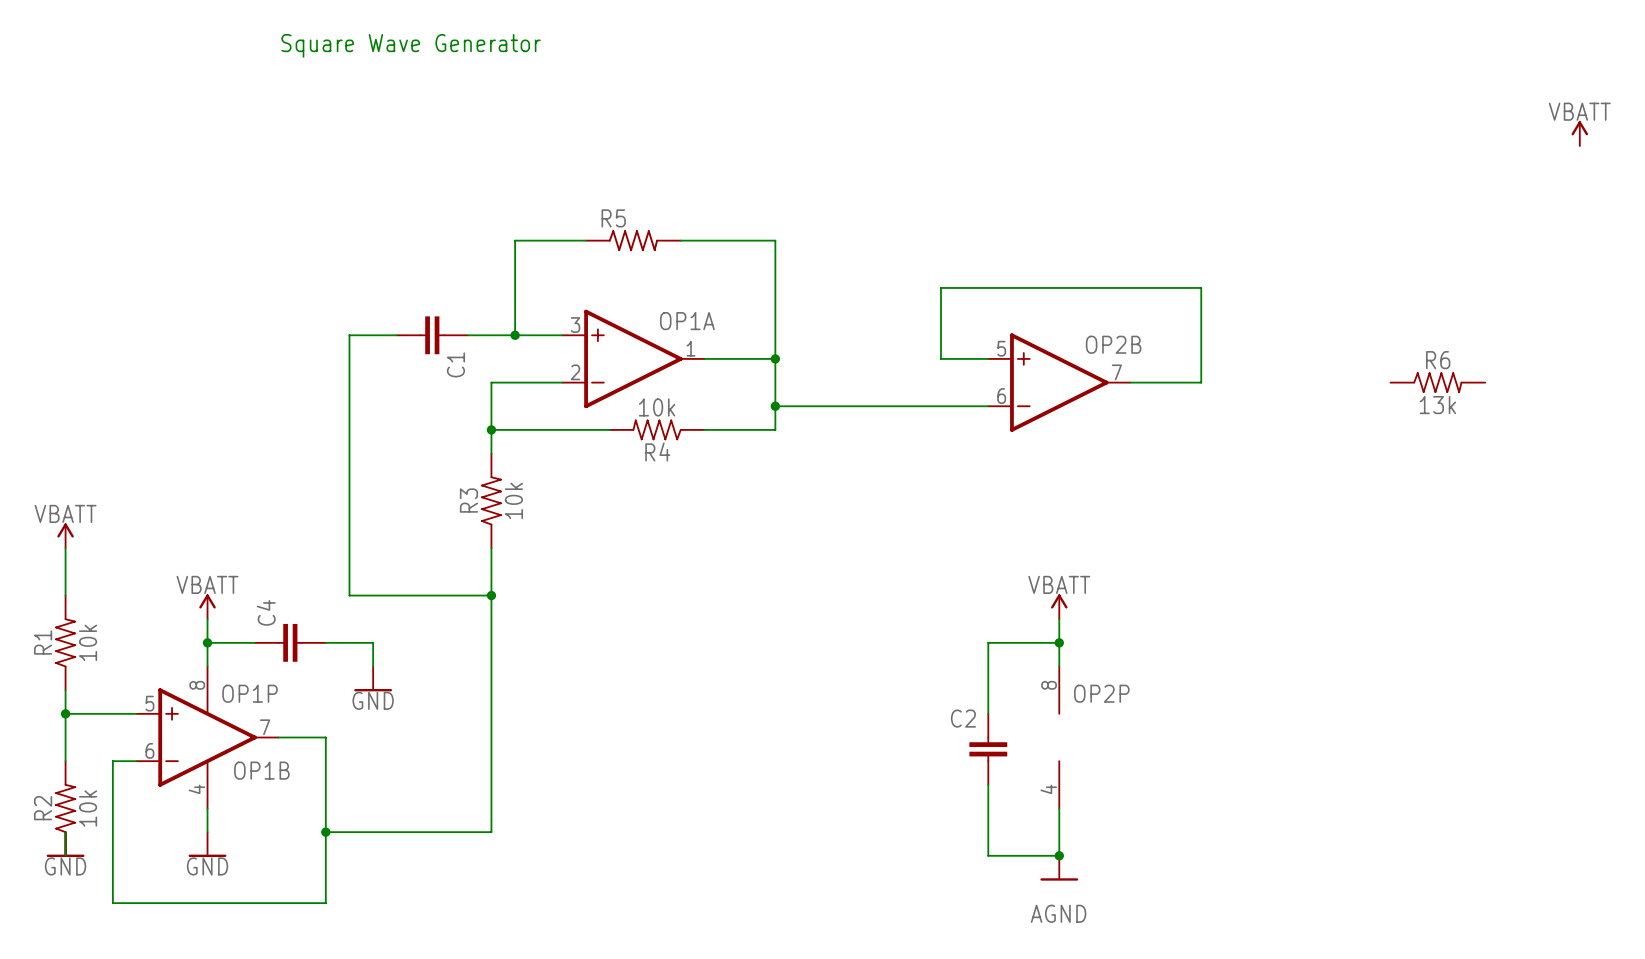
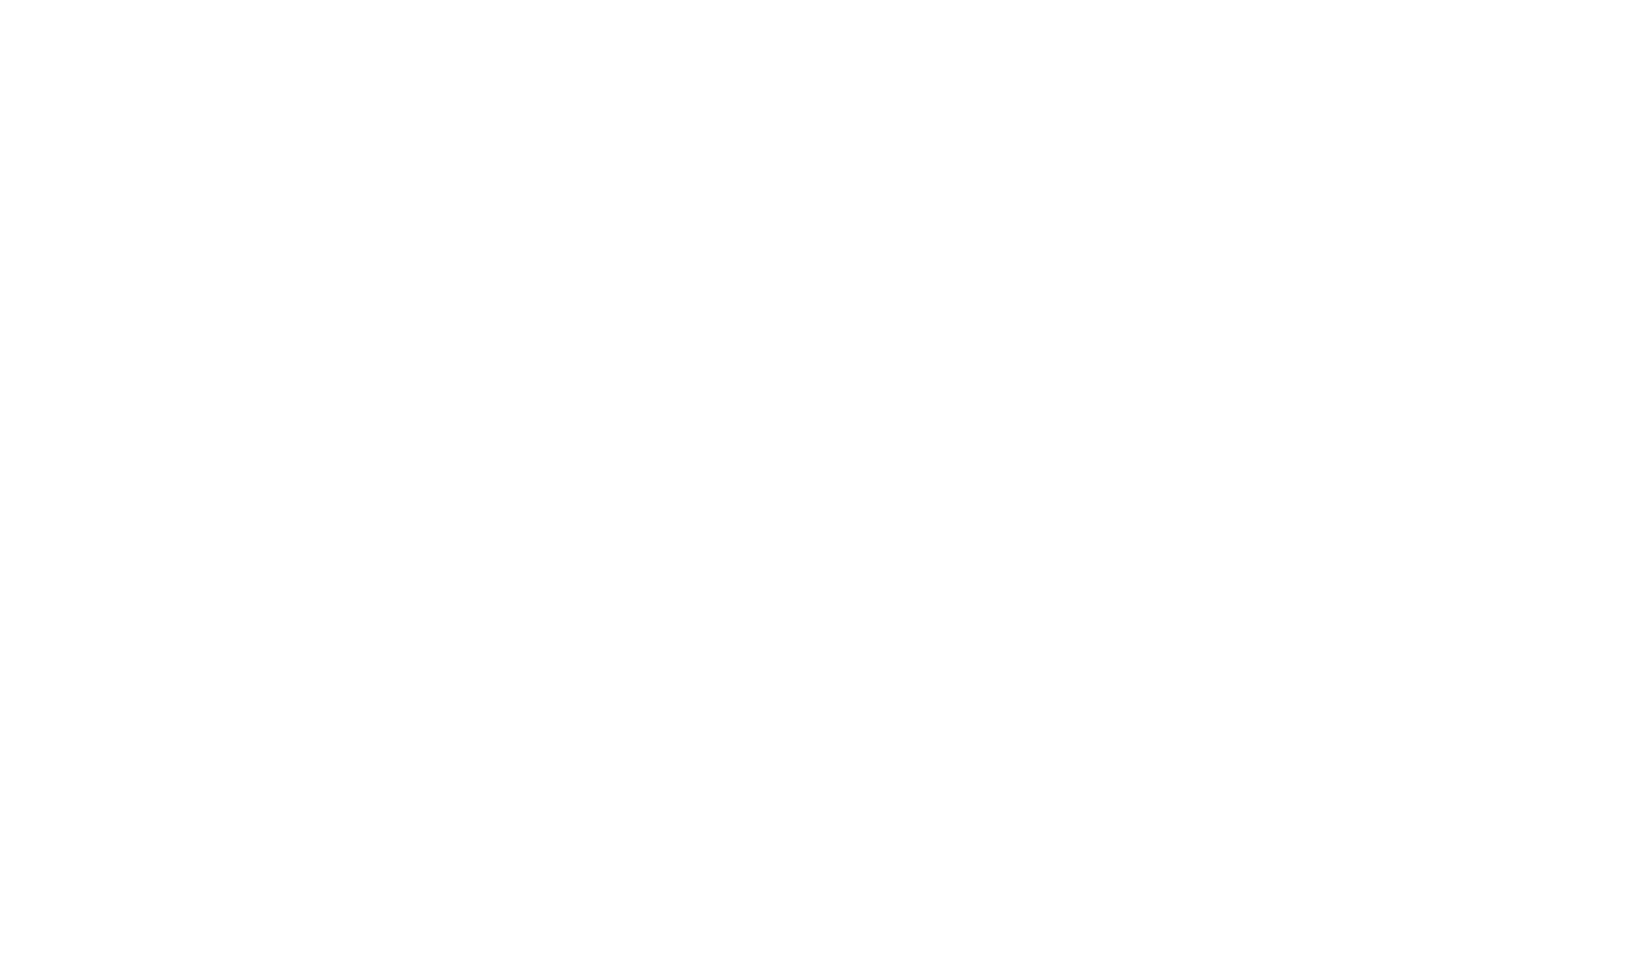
text: Square Wave Generator (411, 45) -> none
power symbol: VBATT (1579, 133) -> none
wire: (586, 240) (515, 240) (515, 335) -> none
R5: (633, 240) -> none
wire: (680, 240) (775, 240) (775, 429) (704, 429) -> none
wire: (396, 335) (349, 335) (349, 595) (491, 595) -> none
C1: (432, 335) -> none
wire: (467, 335) (562, 335) -> none
junction: (515, 335) -> none
OP1A: (633, 358) -> none
wire: (704, 358) (775, 358) -> none
junction: (775, 358) -> none
wire: (988, 358) (940, 358) (940, 287) (1201, 287) (1201, 382) (1130, 382) -> none
wire: (562, 382) (491, 382) (491, 453) -> none
OP2B: (1059, 382) -> none
R6: 13k (1437, 382) -> none
wire: (775, 406) (988, 406) -> none
junction: (775, 406) -> none
wire: (491, 429) (609, 429) -> none
junction: (491, 429) -> none
R4: 10k (657, 429) -> none
R3: 10k (491, 500) -> none
power symbol: VBATT (65, 535) -> none
wire: (65, 548) (65, 595) -> none
wire: (491, 548) (491, 832) (325, 832) -> none
junction: (491, 595) -> none
power symbol: VBATT (207, 606) -> none
power symbol: VBATT (1059, 606) -> none
wire: (207, 619) (207, 666) -> none
wire: (1059, 619) (1059, 666) -> none
R1: 10k (65, 642) -> none
wire: (207, 642) (254, 642) -> none
junction: (207, 642) -> none
C4: (290, 642) -> none
wire: (325, 642) (373, 642) (373, 666) -> none
wire: (1059, 642) (988, 642) (988, 713) -> none
junction: (1059, 642) -> none
power symbol: GND (373, 678) -> none
wire: (65, 690) (65, 761) -> none
wire: (65, 713) (136, 713) -> none
junction: (65, 713) -> none
OP1P: (207, 737) -> none
OP1B: (207, 737) -> none
wire: (278, 737) (325, 737) (325, 903) (112, 903) (112, 761) (136, 761) -> none
OP2P: (1059, 737) -> none
C2: (988, 749) -> none
wire: (988, 784) (988, 855) (1059, 855) (1059, 808) -> none
R2: 10k (65, 808) -> none
wire: (207, 808) (207, 832) -> none
wire: (65, 832) (65, 855) -> none
junction: (325, 832) -> none
power symbol: GND (65, 844) -> none
power symbol: GND (207, 844) -> none
junction: (1059, 855) -> none
power symbol: AGND (1059, 868) -> none

